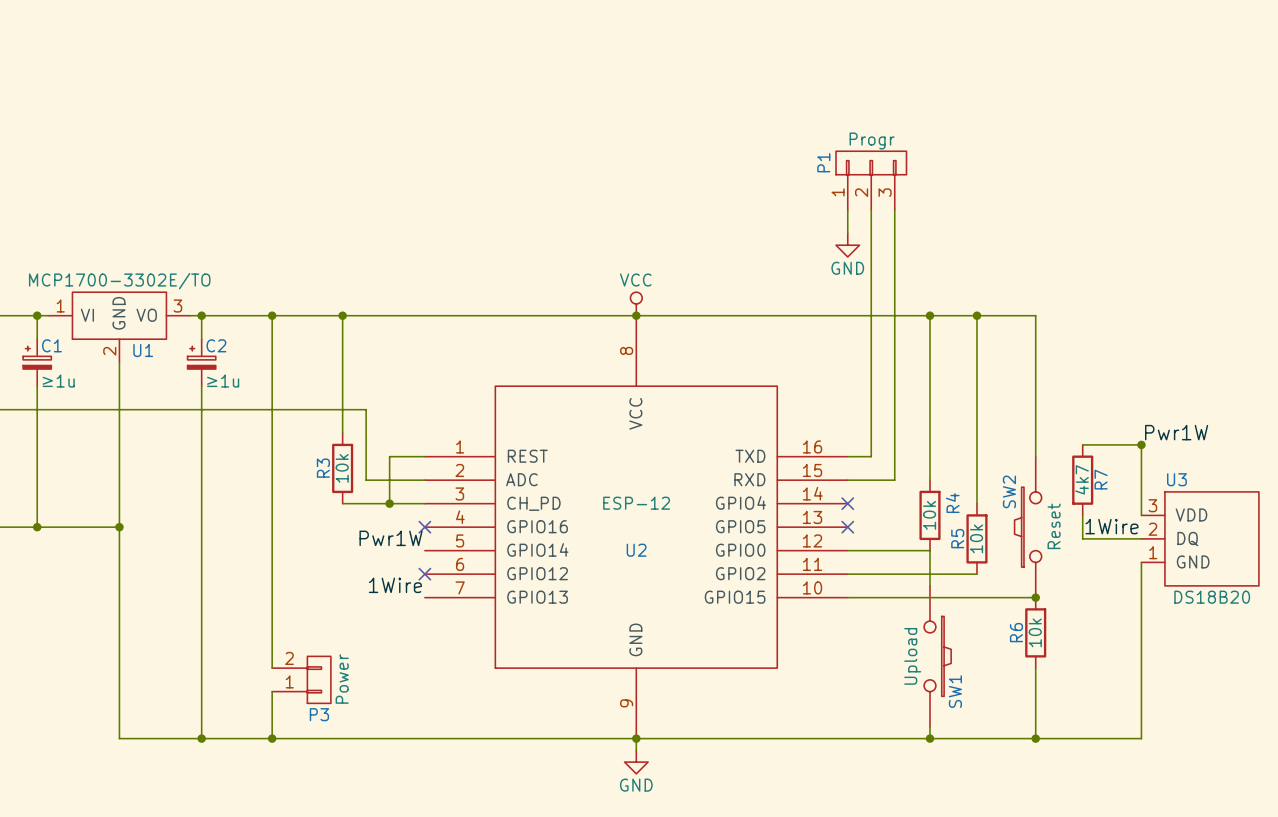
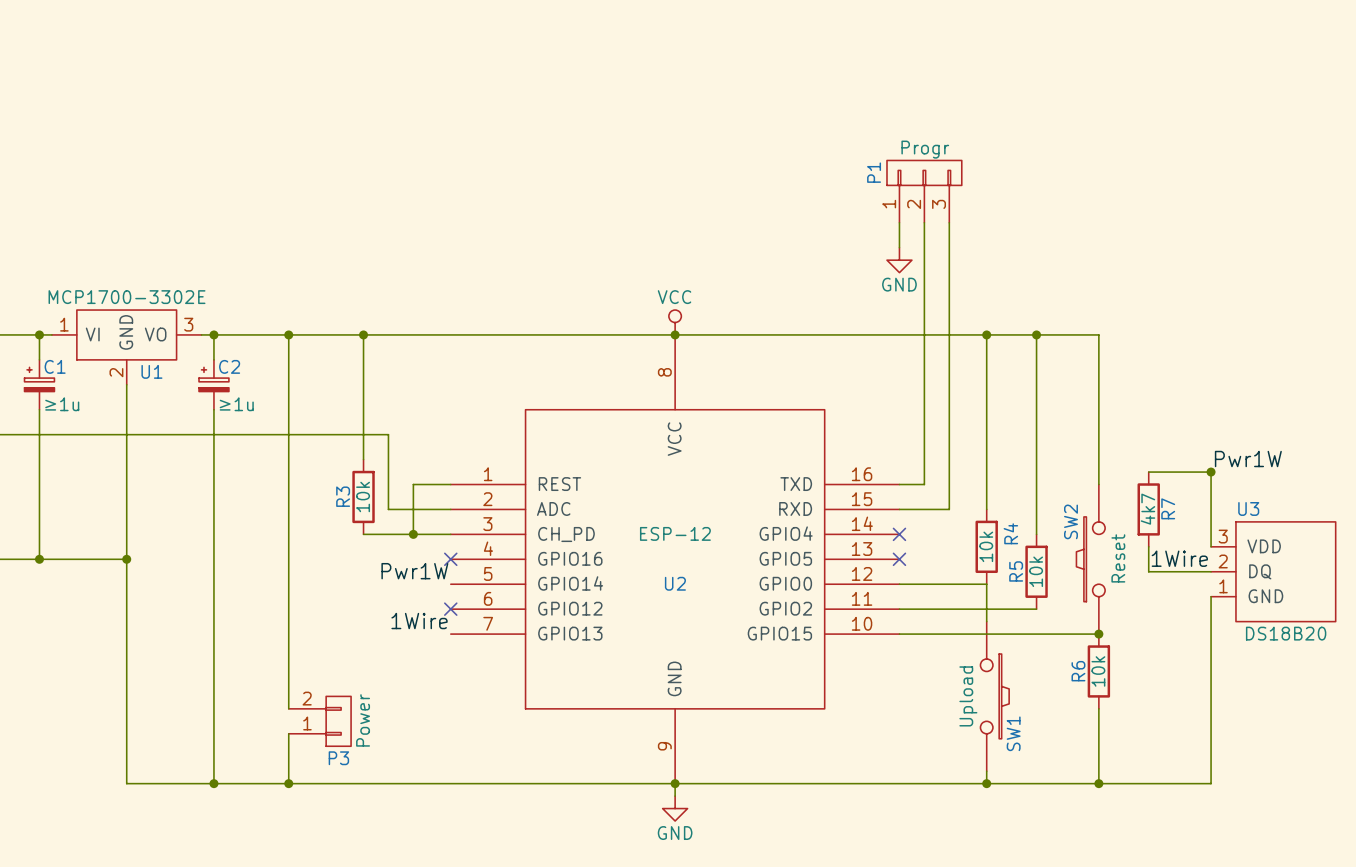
U1 value: MCP1700-3302E/TO (119, 281) -> MCP1700-3302E (127, 297)

